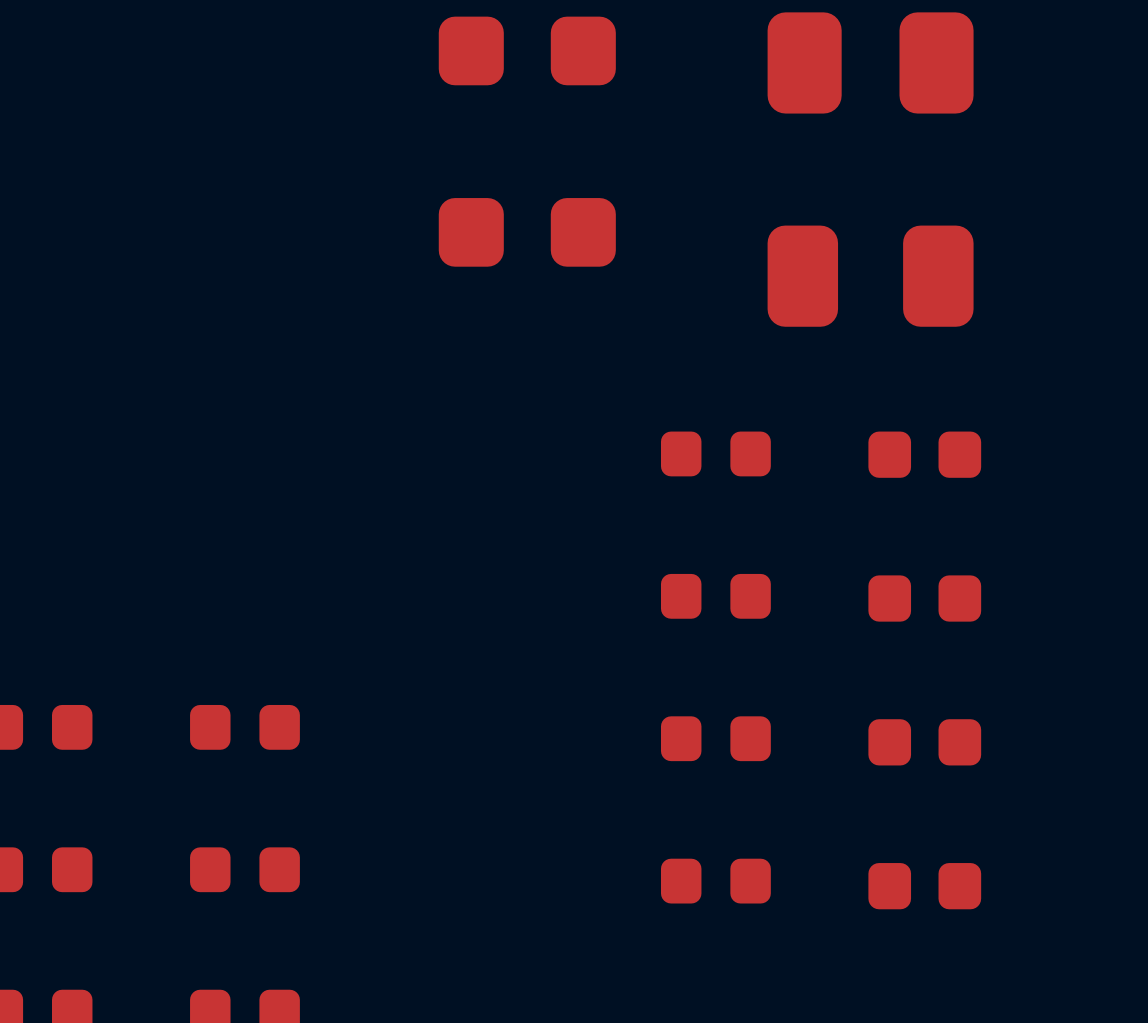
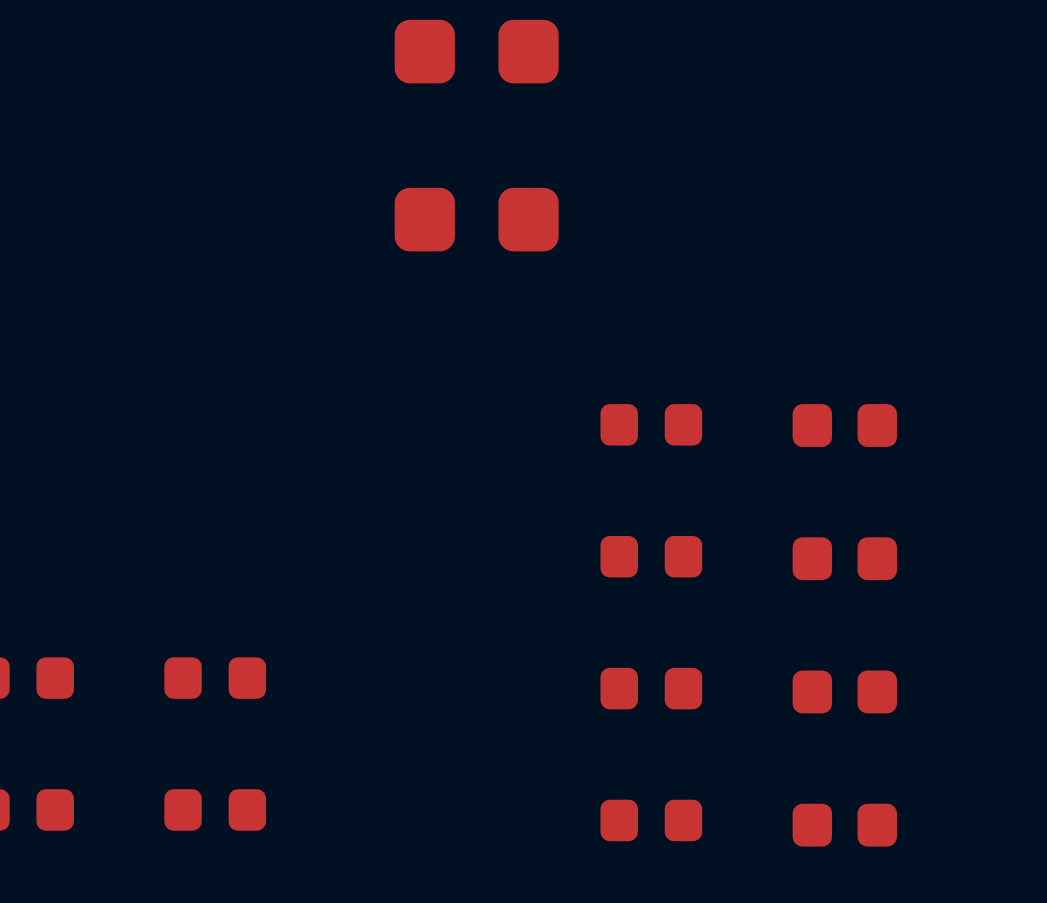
part: (870, 62) -> none
part: (870, 276) -> none

